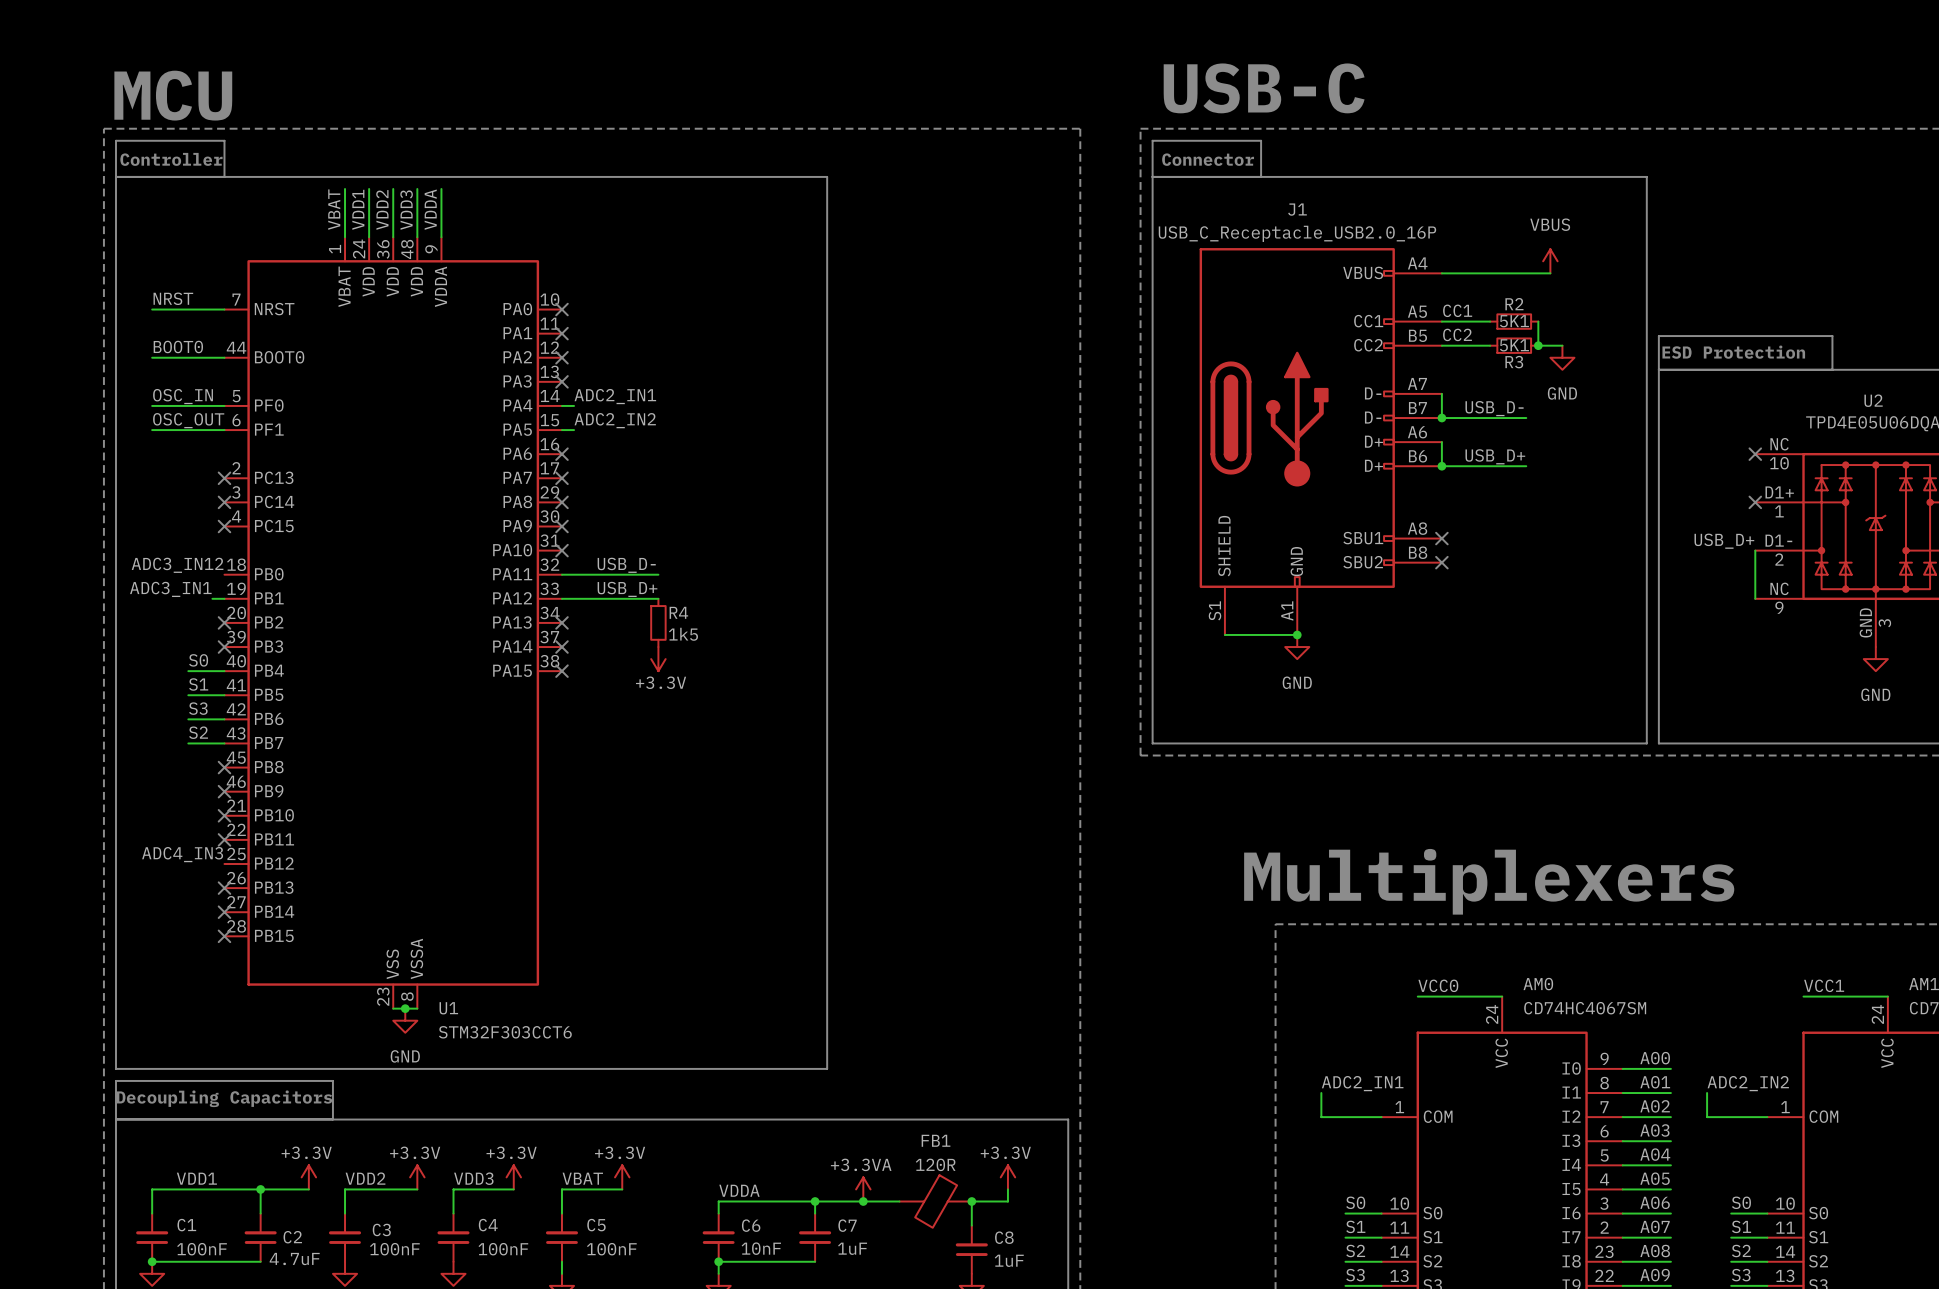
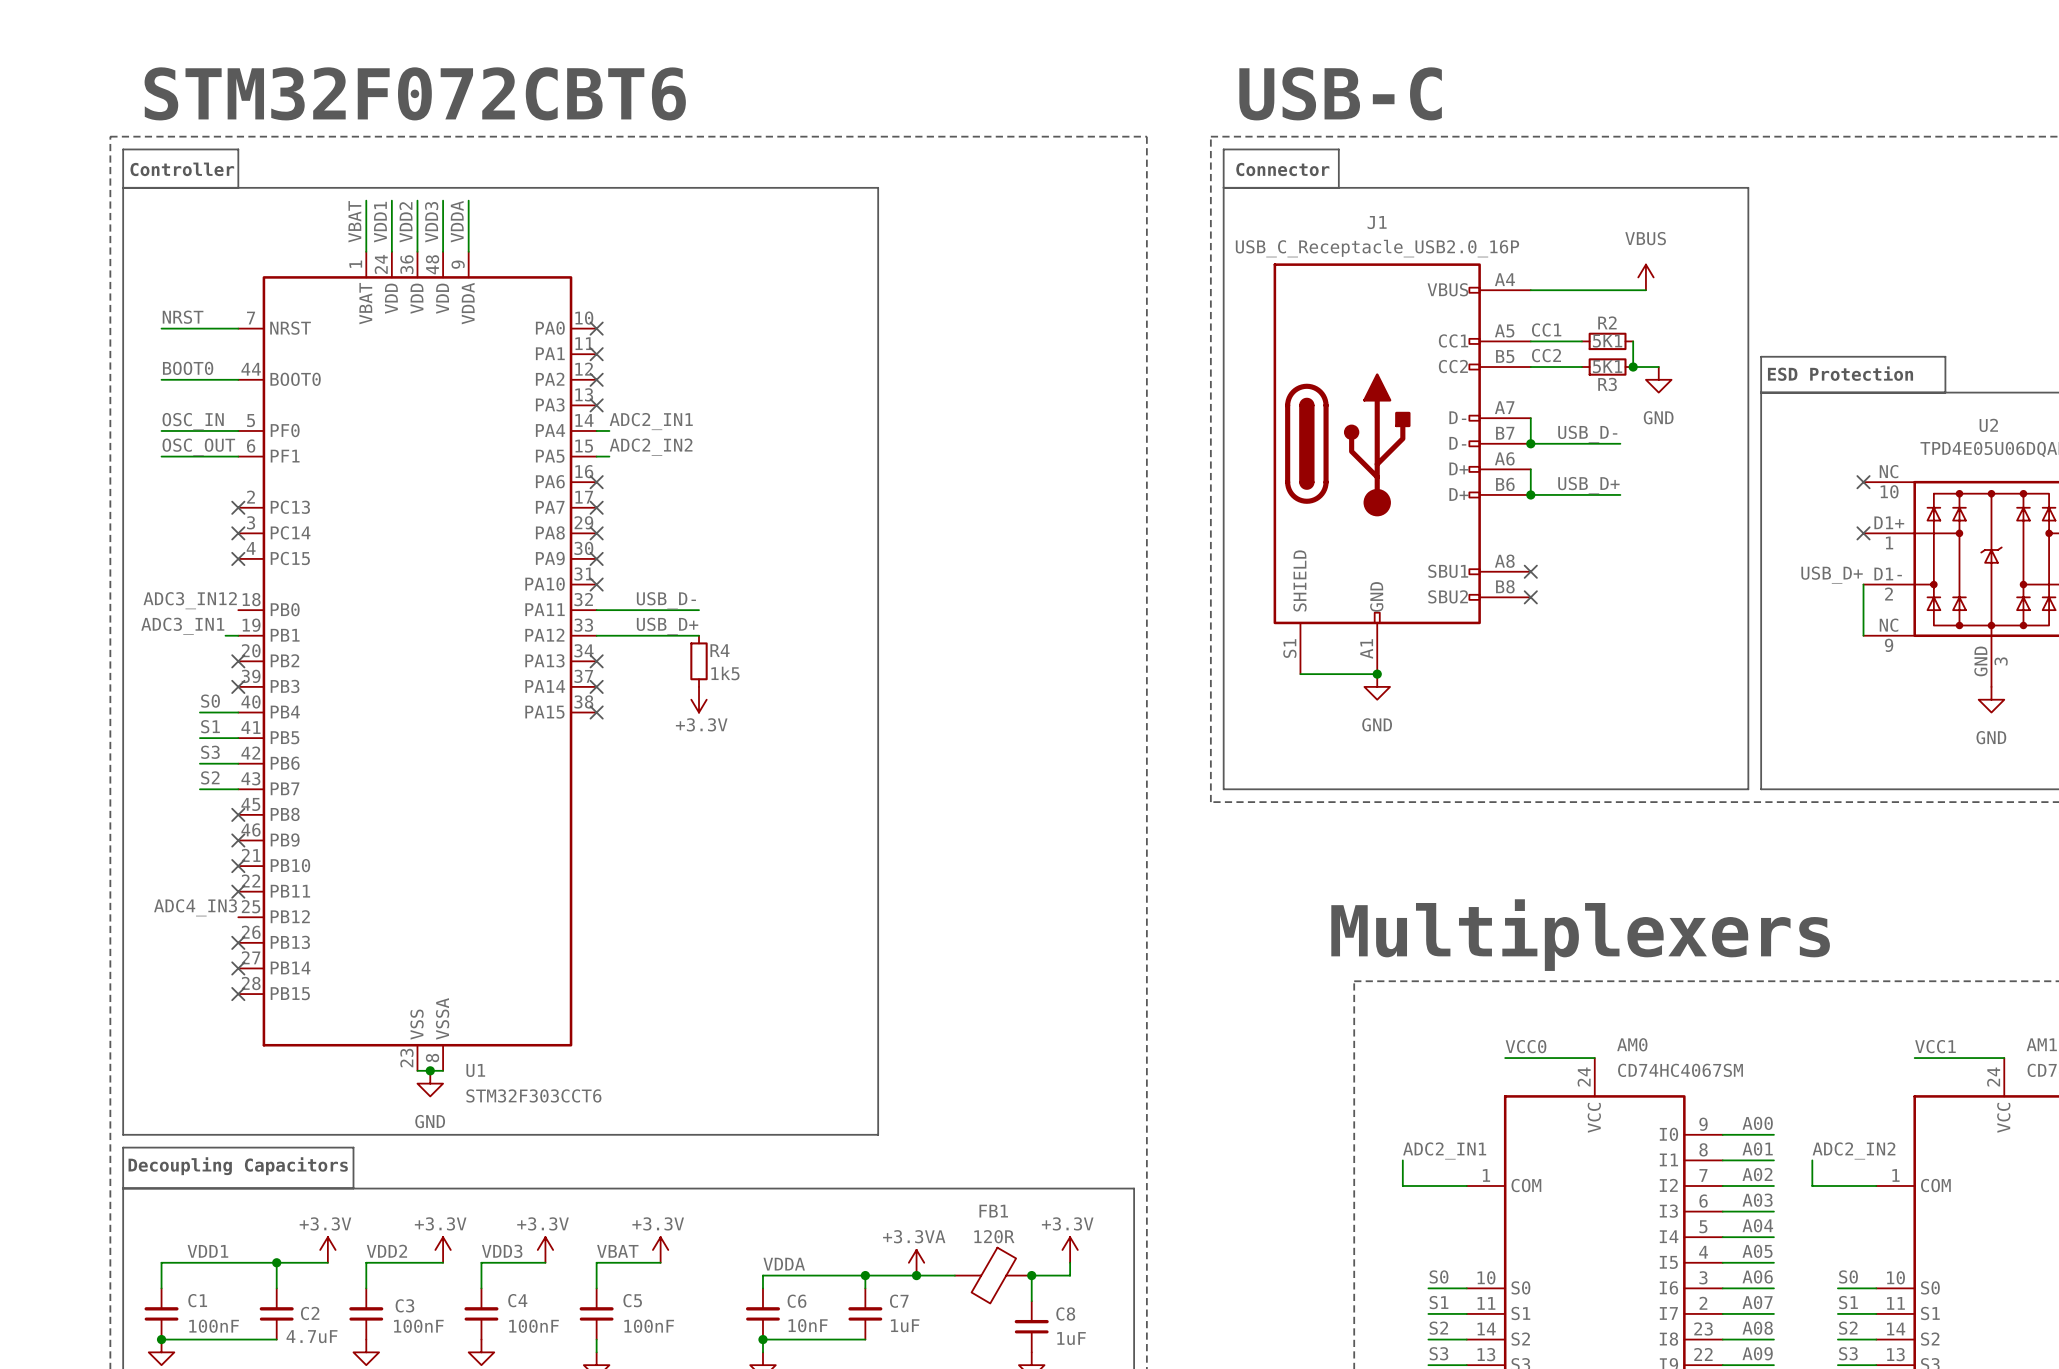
text: none -> STM32F072CBT6 (415, 93)
text: MCU (173, 95) -> none

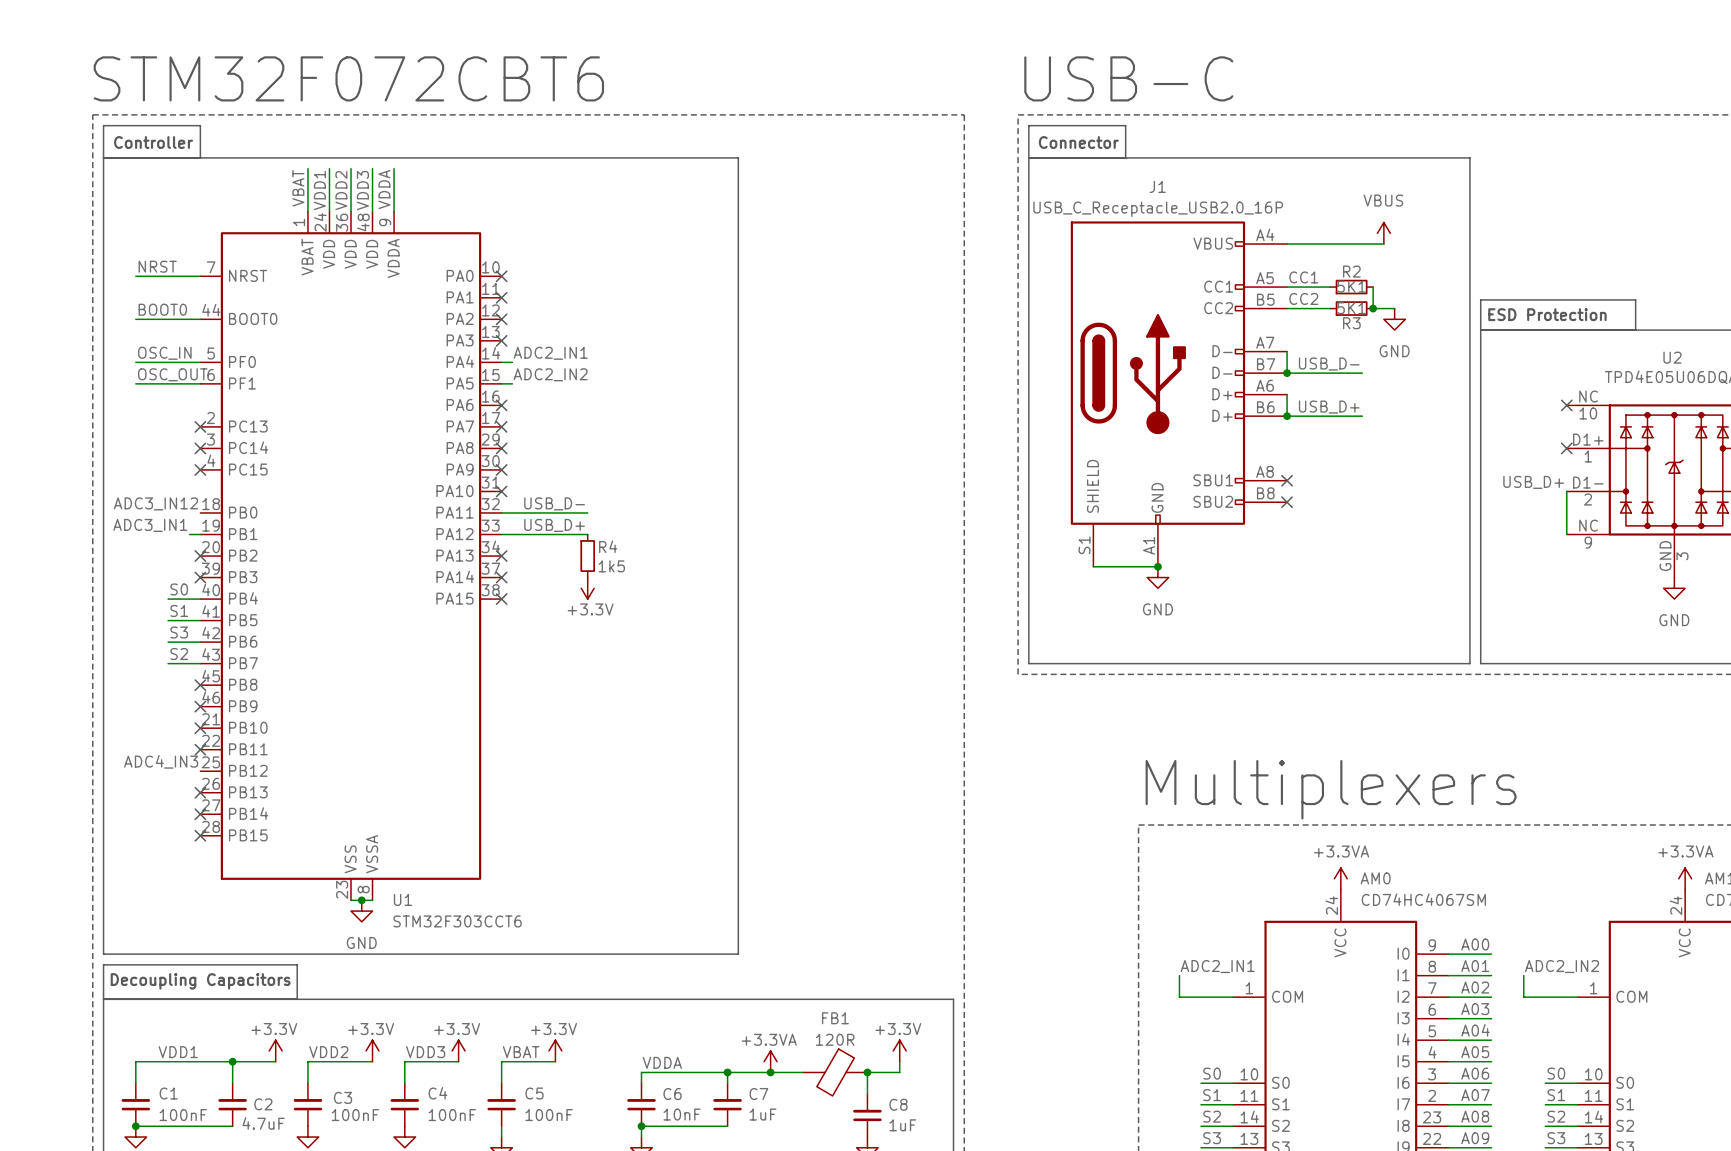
power symbol: none -> +3.3VA (1340, 878)
power symbol: none -> +3.3VA (1685, 878)
label: VCC0 (1526, 1046) -> none
label: VCC1 (1935, 1046) -> none
wire: (1505, 1058) (1594, 1058) -> none
wire: (1914, 1058) (2004, 1058) -> none

